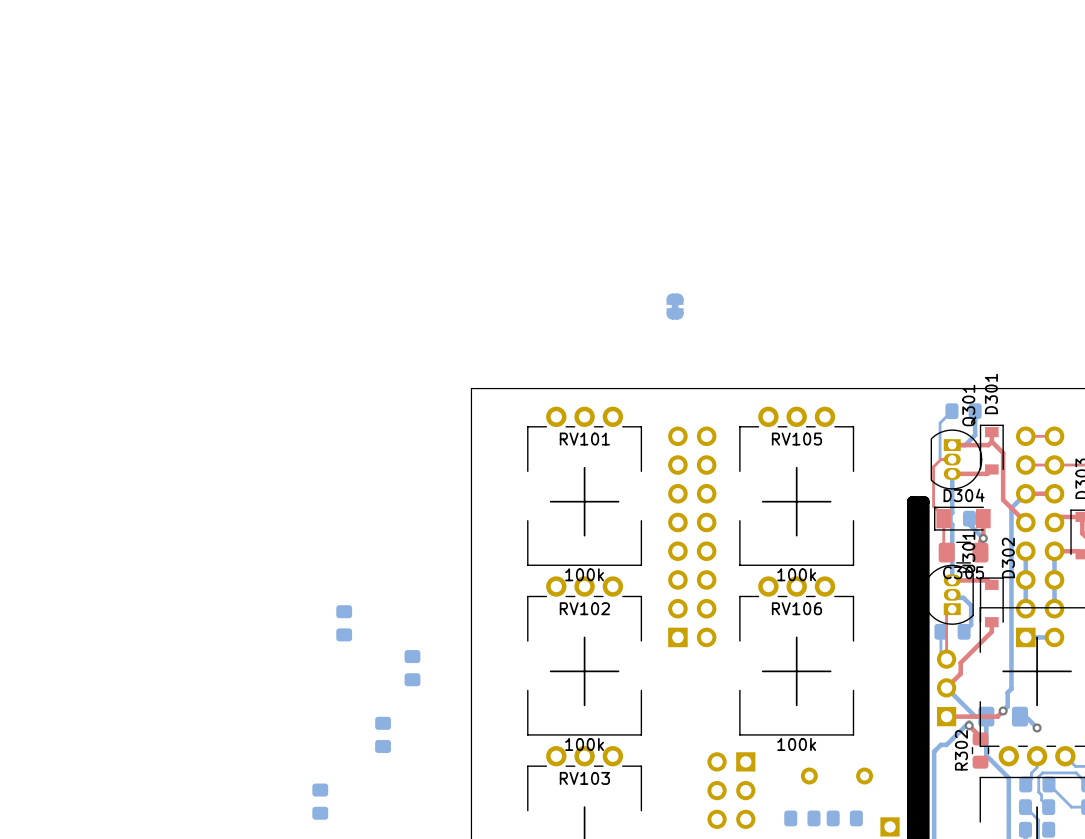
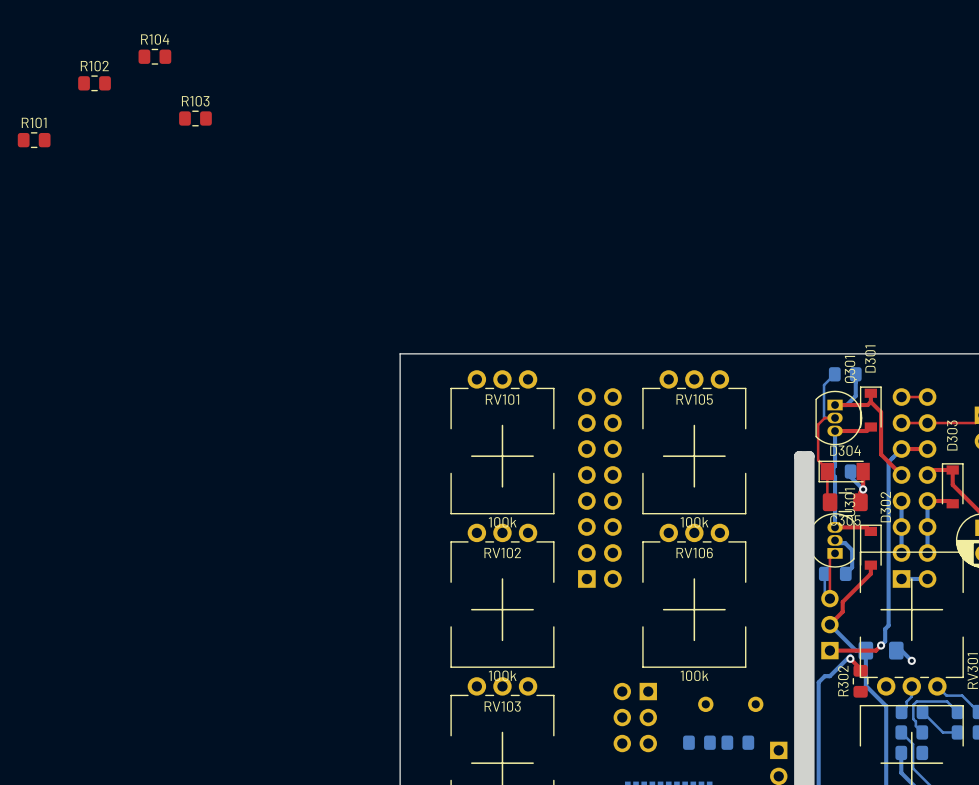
R104: none -> (154, 56)
R102: none -> (94, 83)
R103: none -> (195, 118)
R101: none -> (34, 140)
part: (675, 306) -> none
part: (344, 623) -> none
part: (412, 668) -> none
part: (383, 734) -> none
part: (320, 801) -> none

